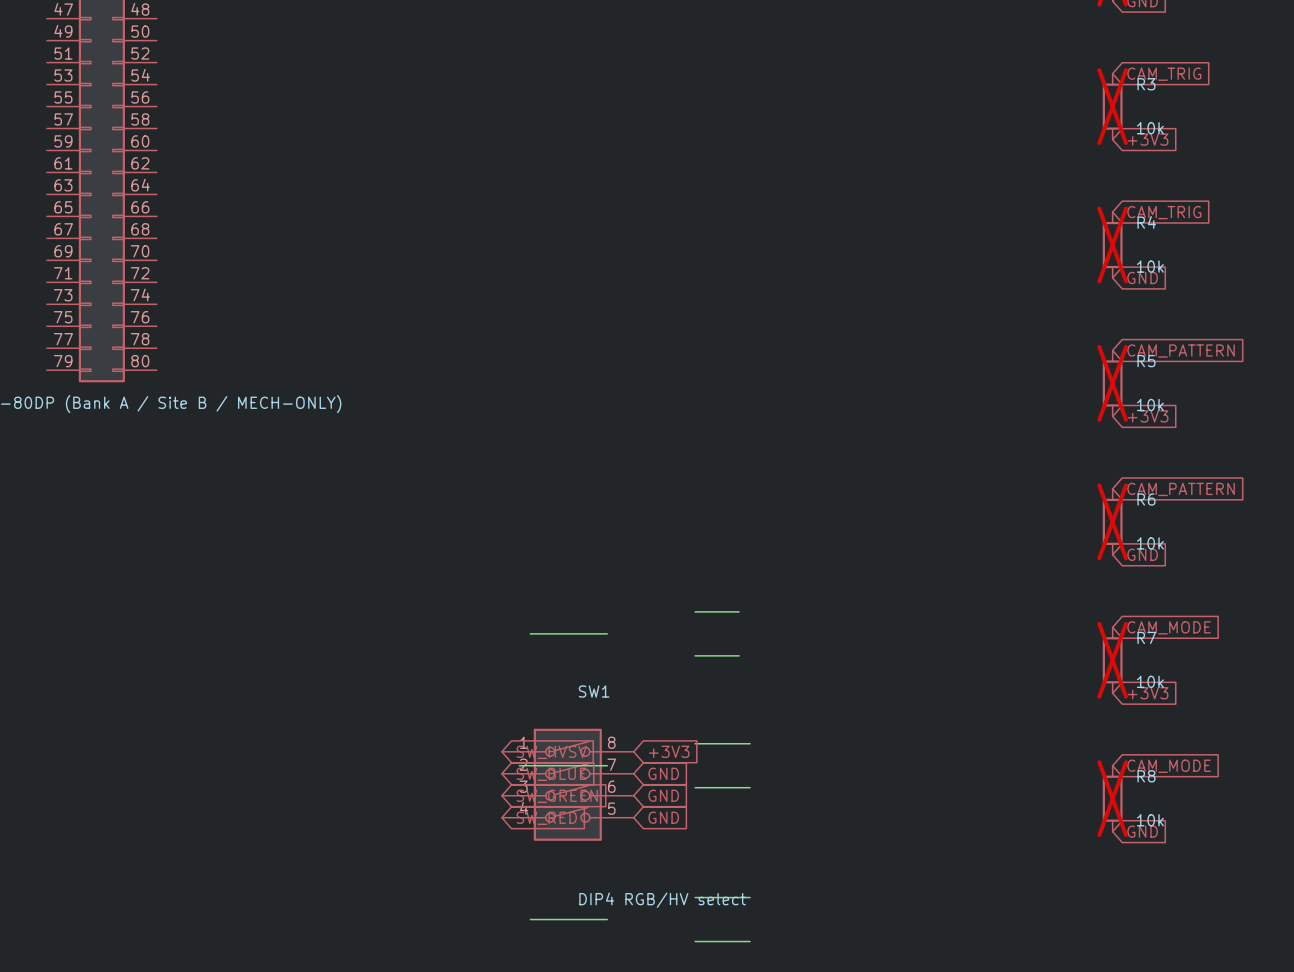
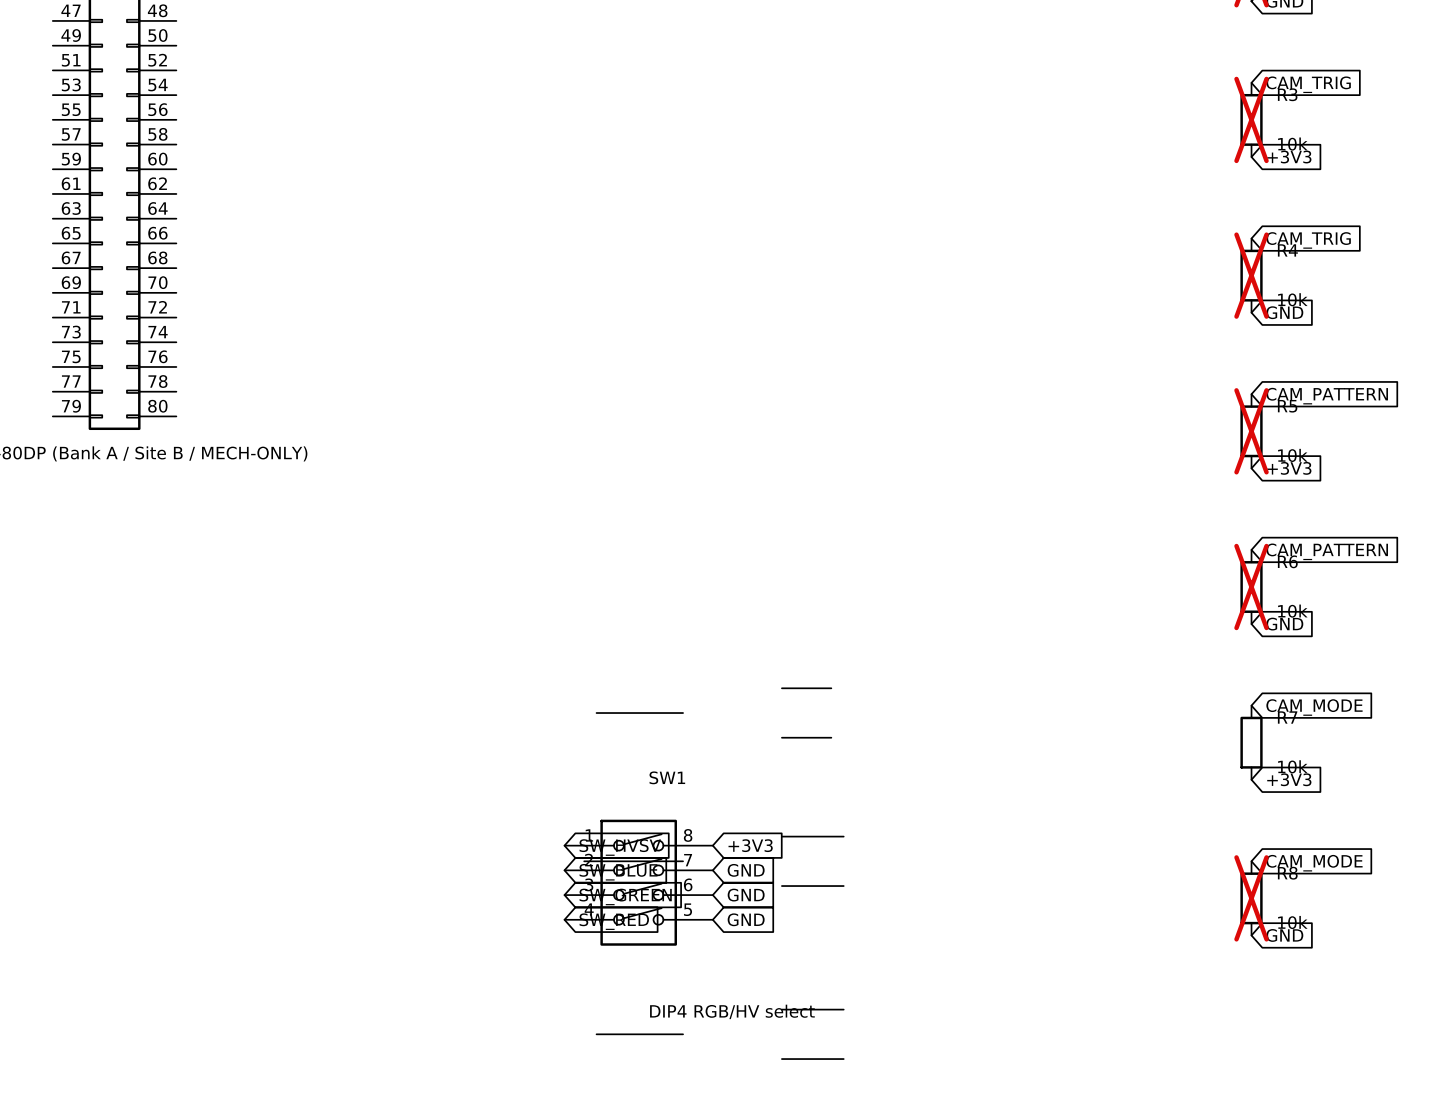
R7 do-not-place cross: (1112, 660) -> none

